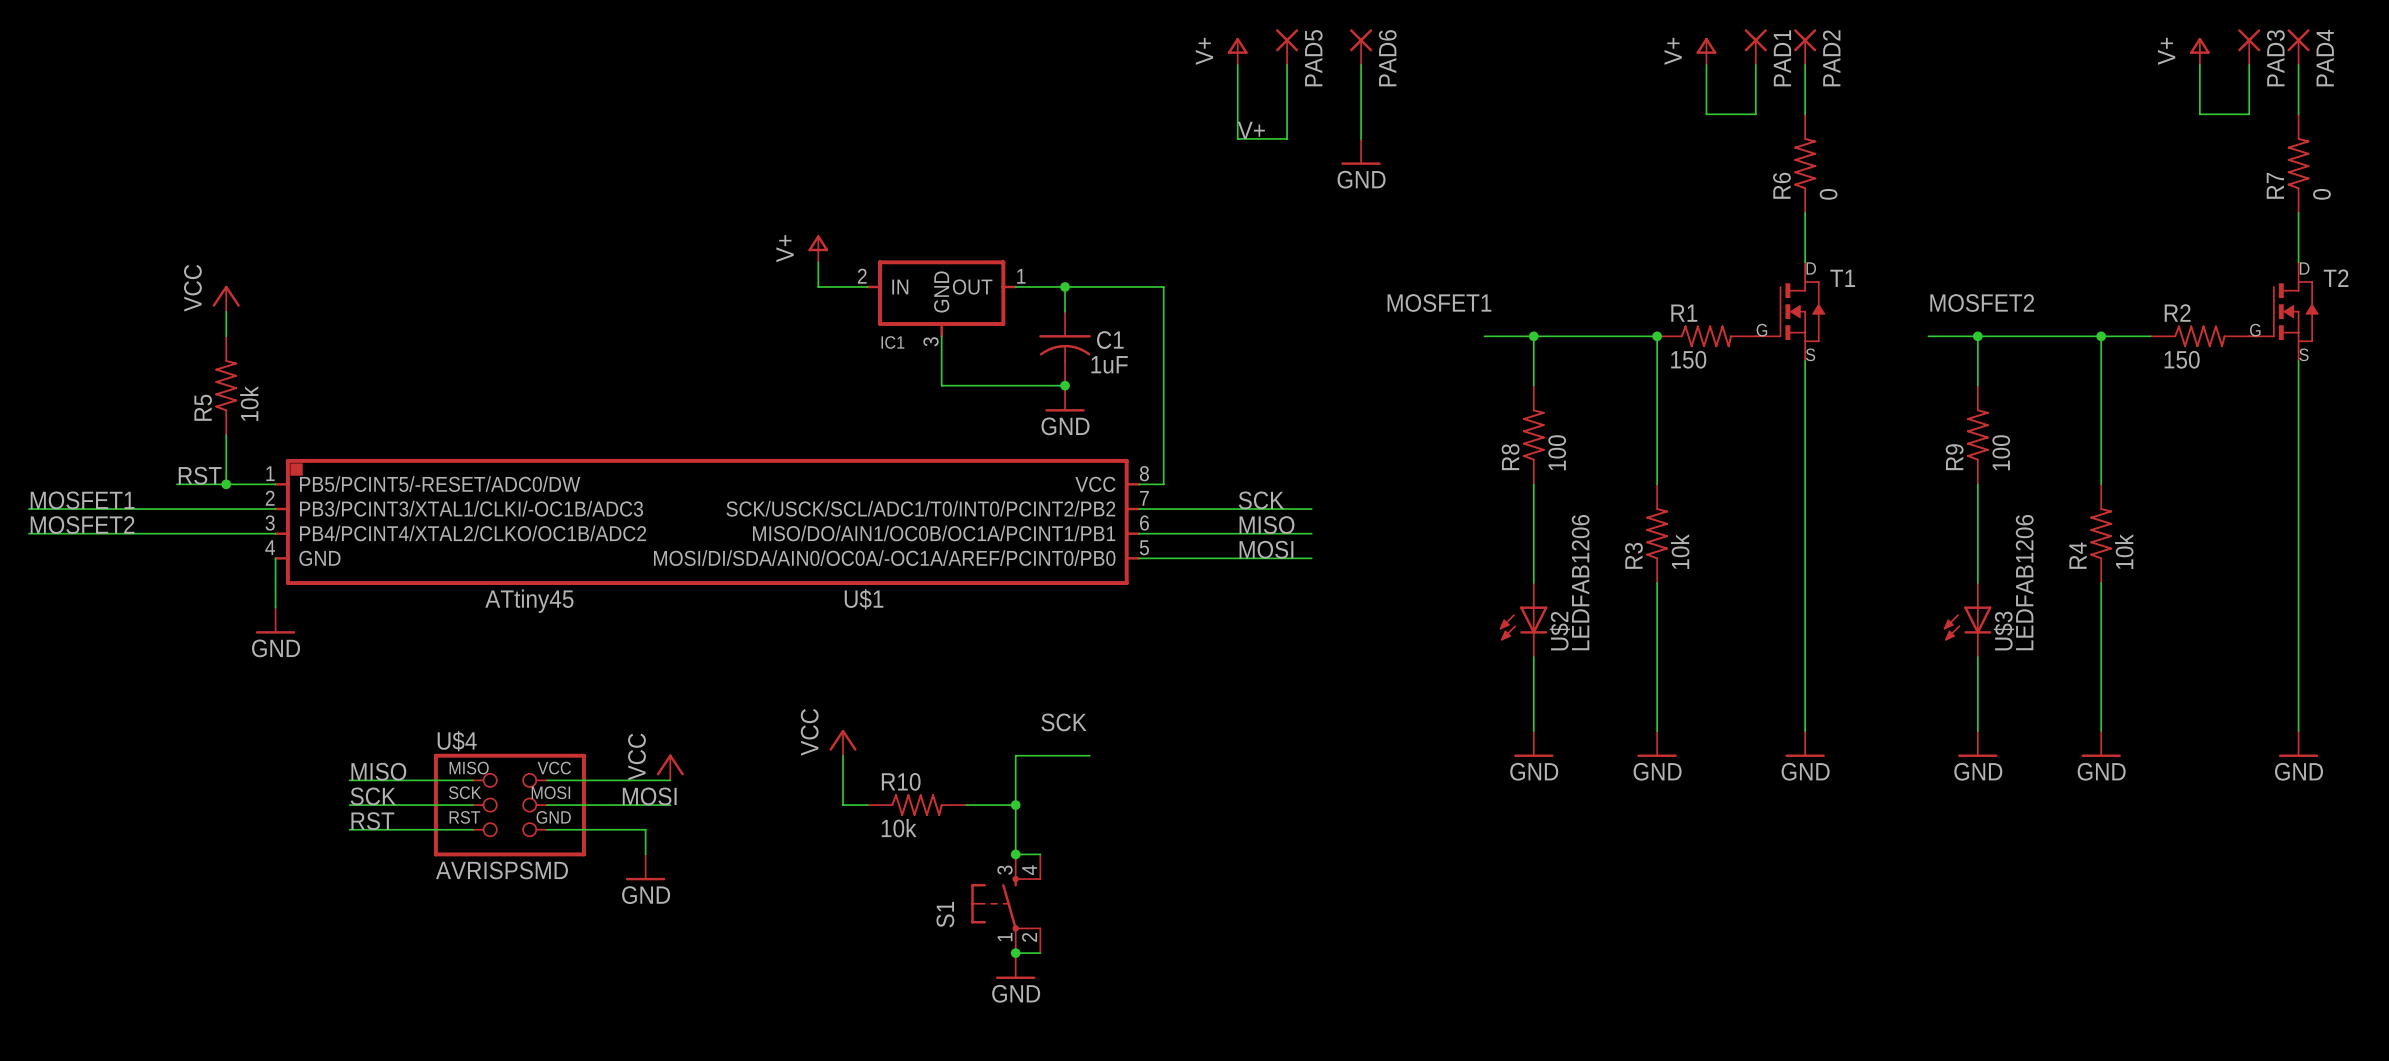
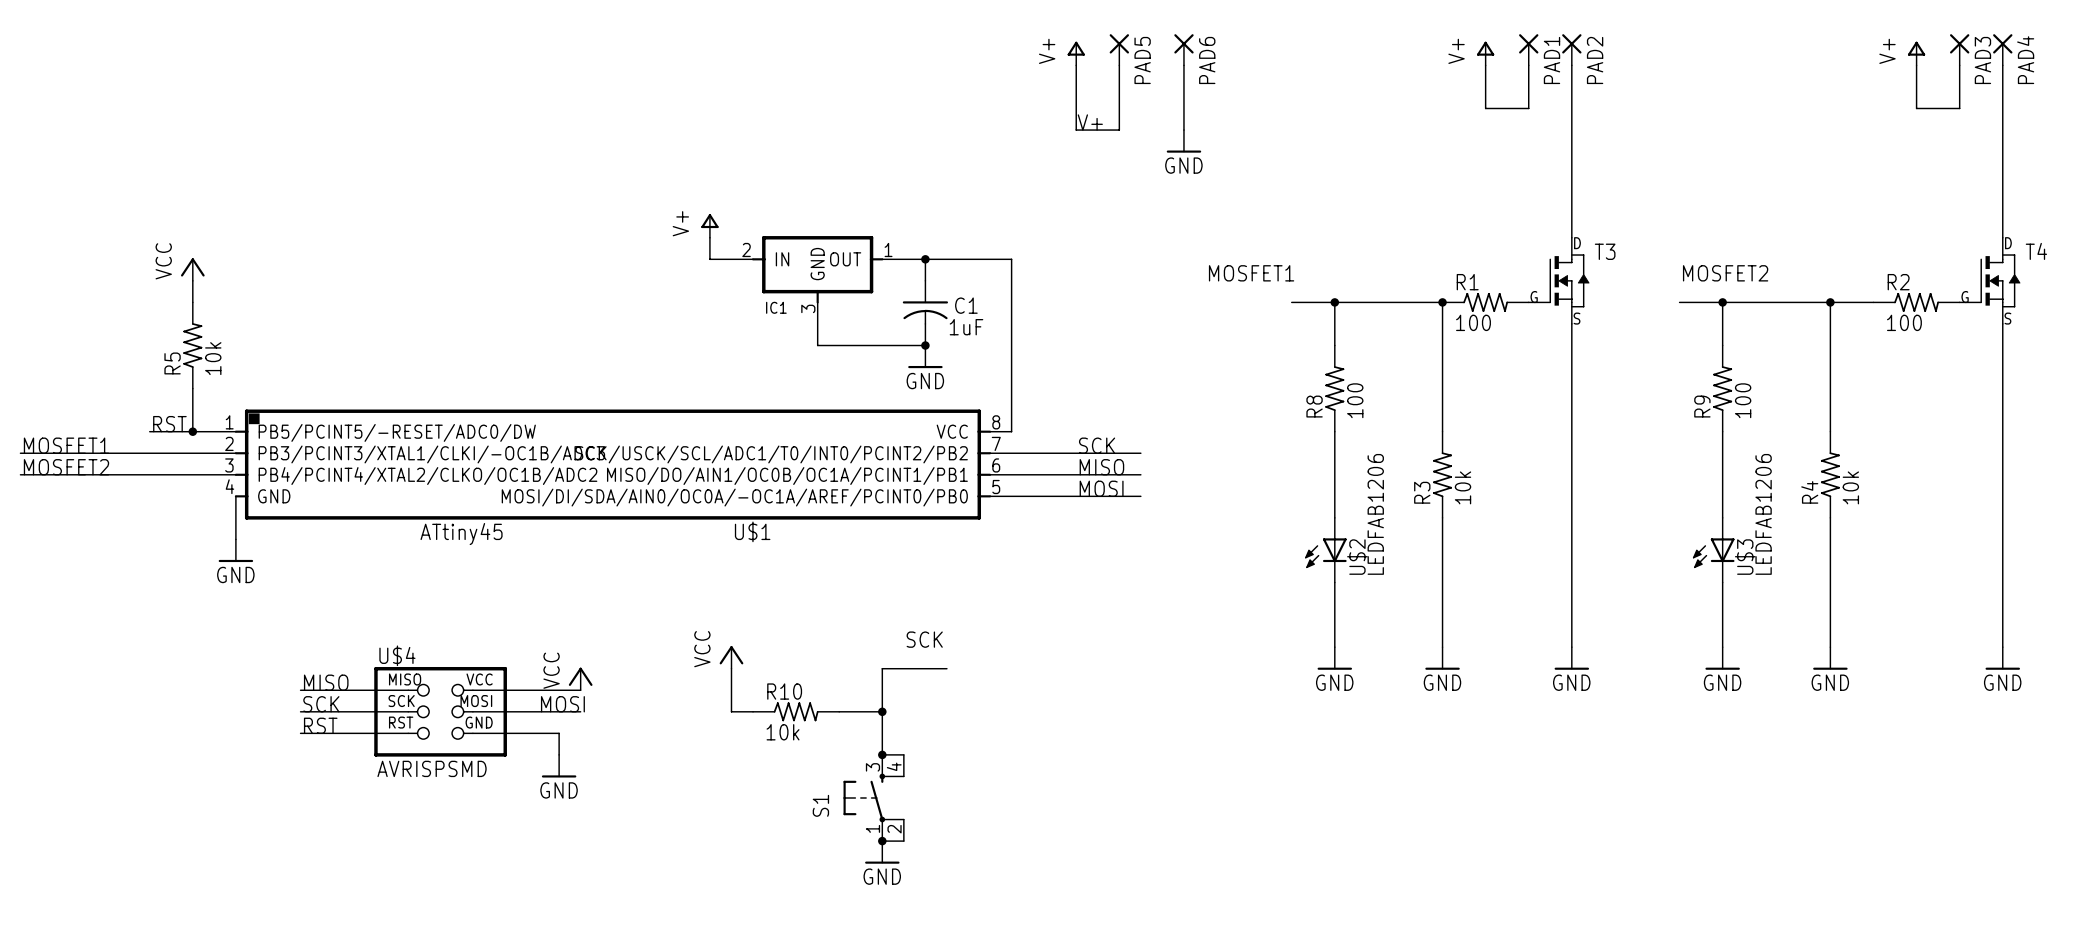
R6: 0 (1805, 163) -> none
R7: 0 (2298, 163) -> none
T1 name: T1 (1842, 278) -> T3 (1605, 251)
T2 name: T2 (2336, 278) -> T4 (2036, 251)
R1 value: 150 (1688, 359) -> 100 (1473, 322)
R2 value: 150 (2182, 359) -> 100 (1904, 322)

